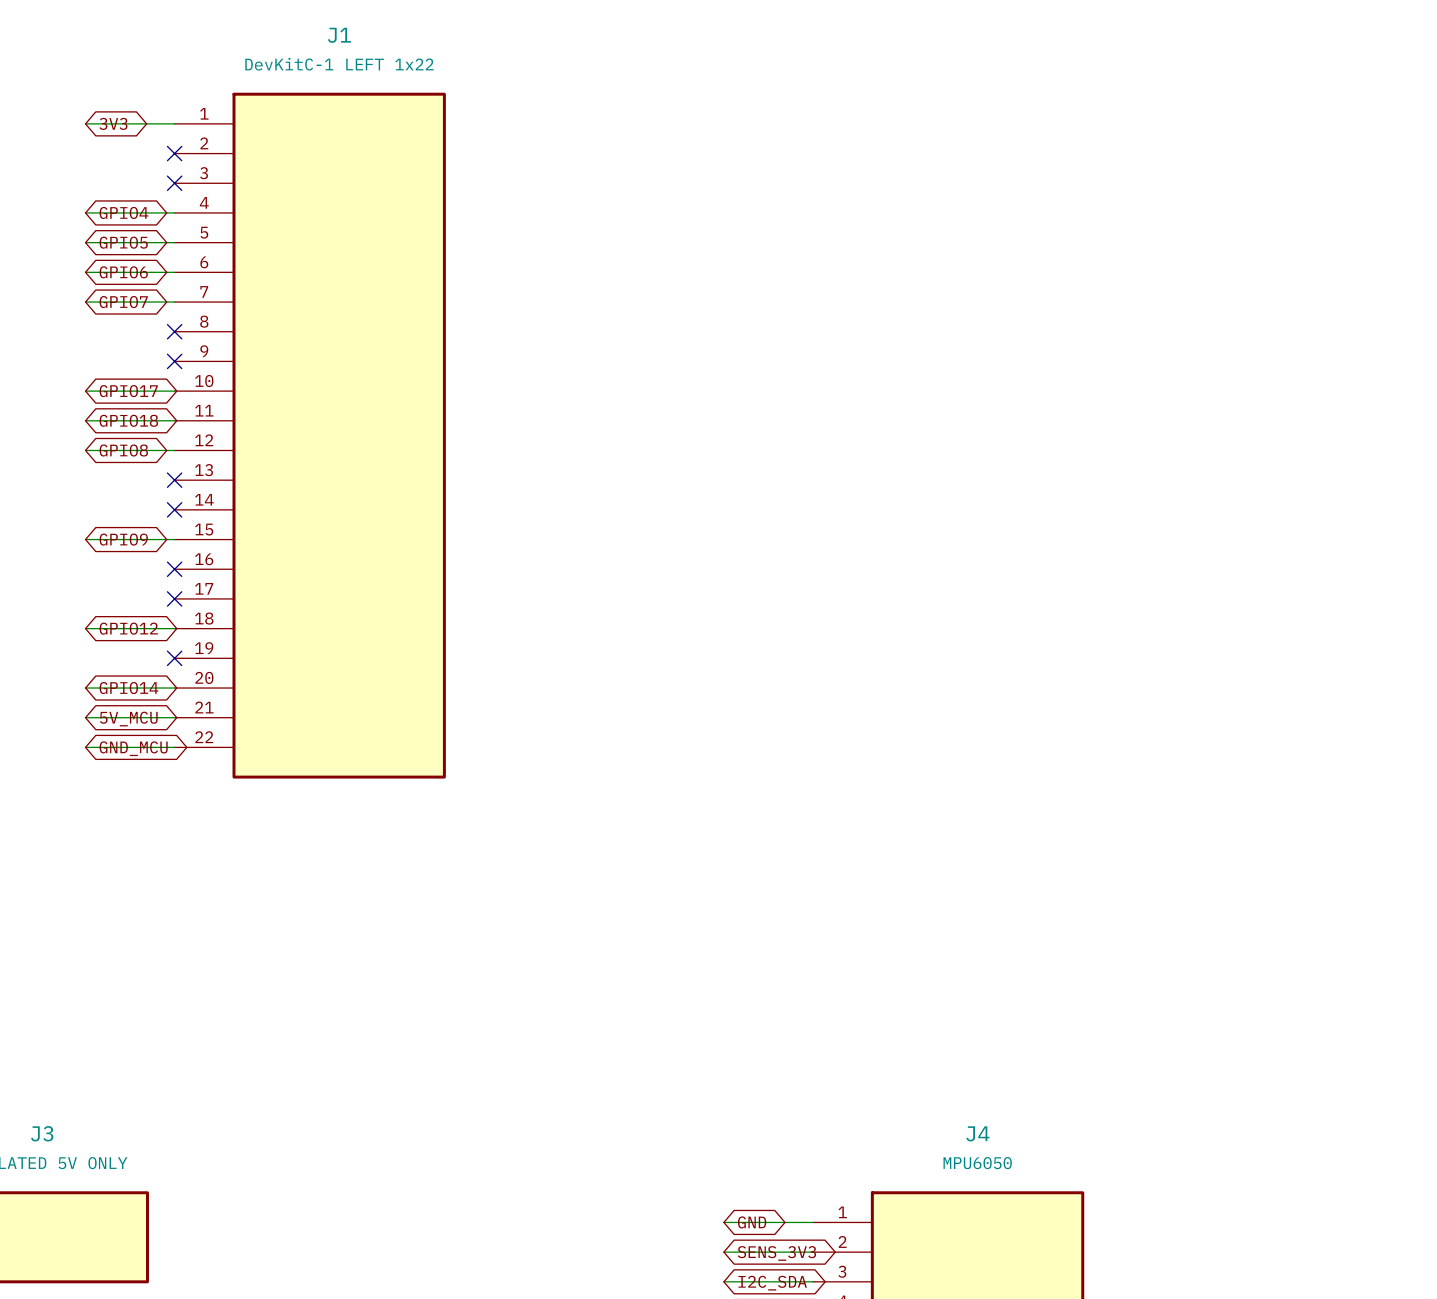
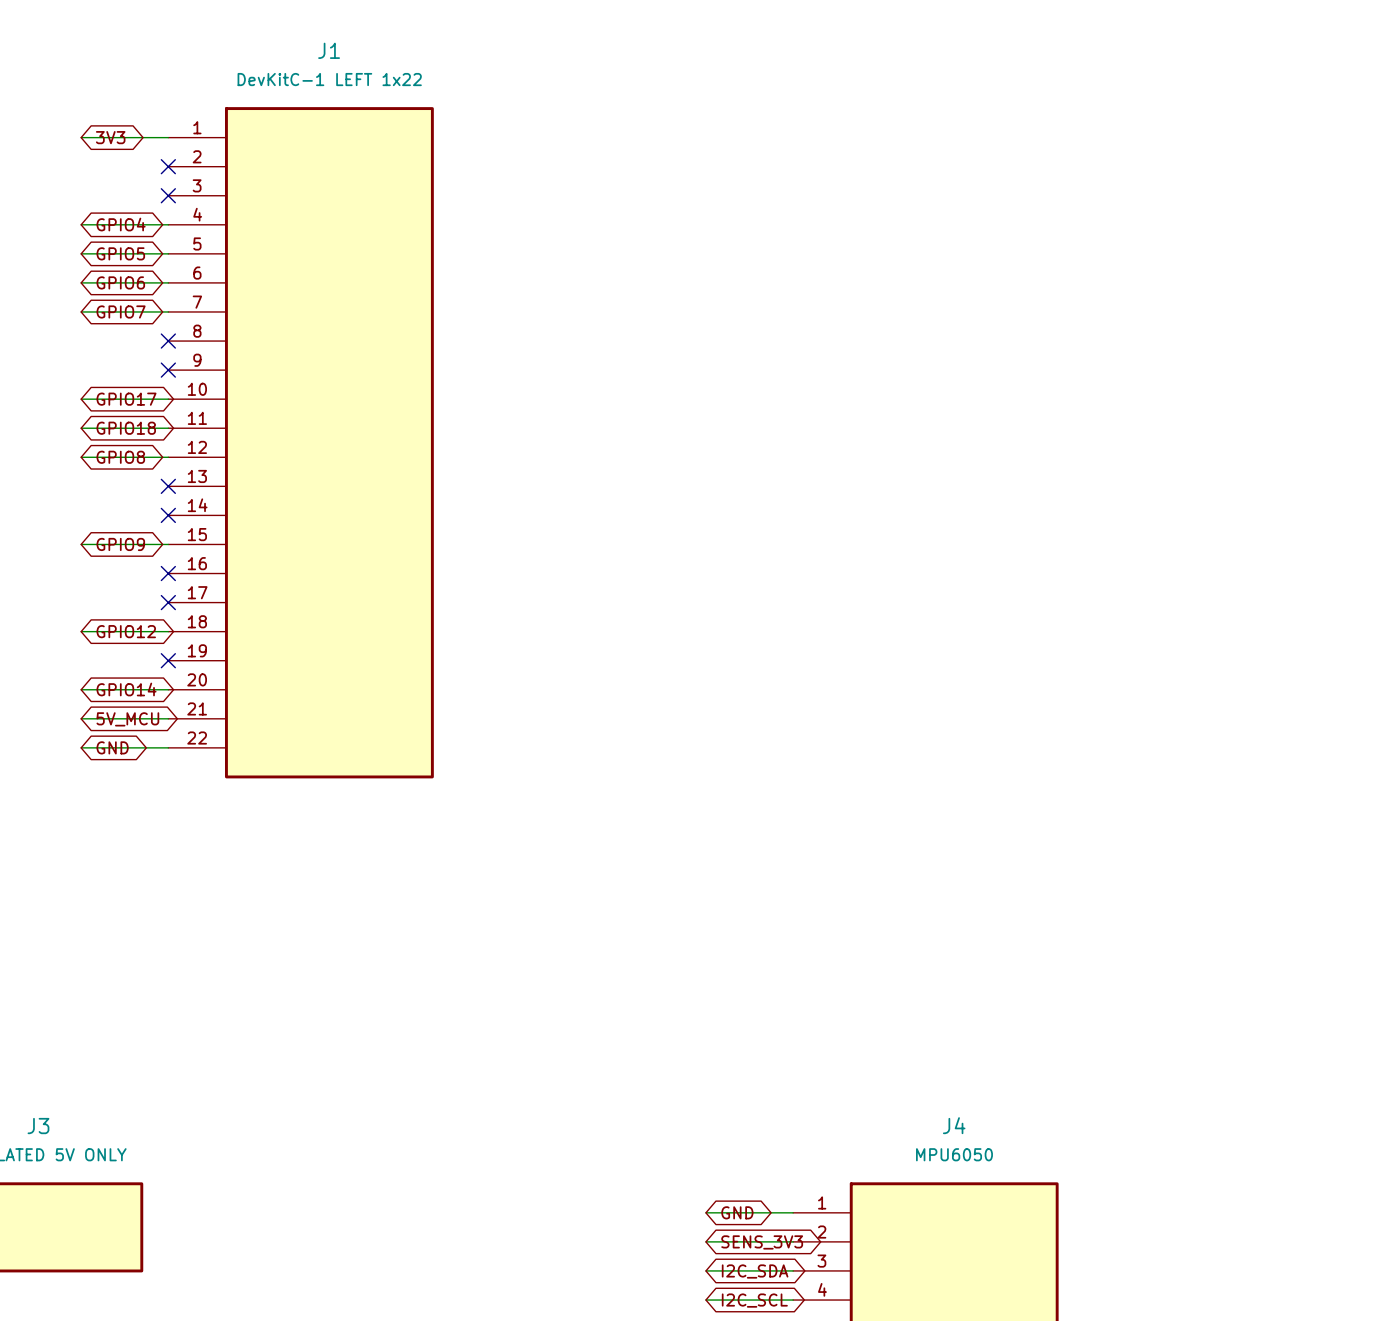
global label: GND_MCU (133, 748) -> GND (112, 747)

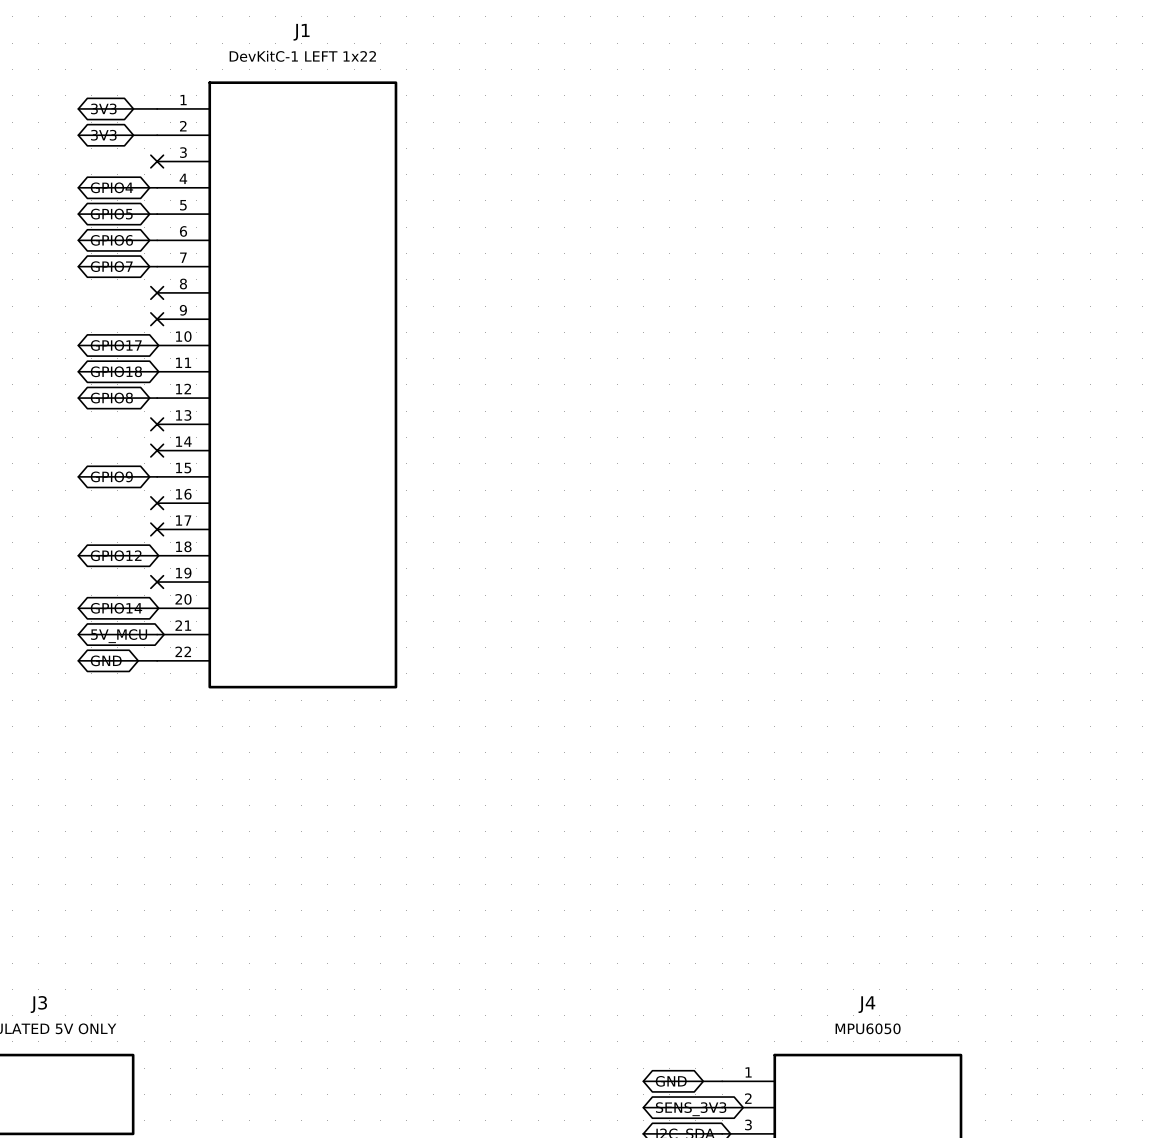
wire: none -> (78, 135) (157, 135)
global label: none -> 3V3 (103, 135)
no-connect mark: (168, 166) -> none

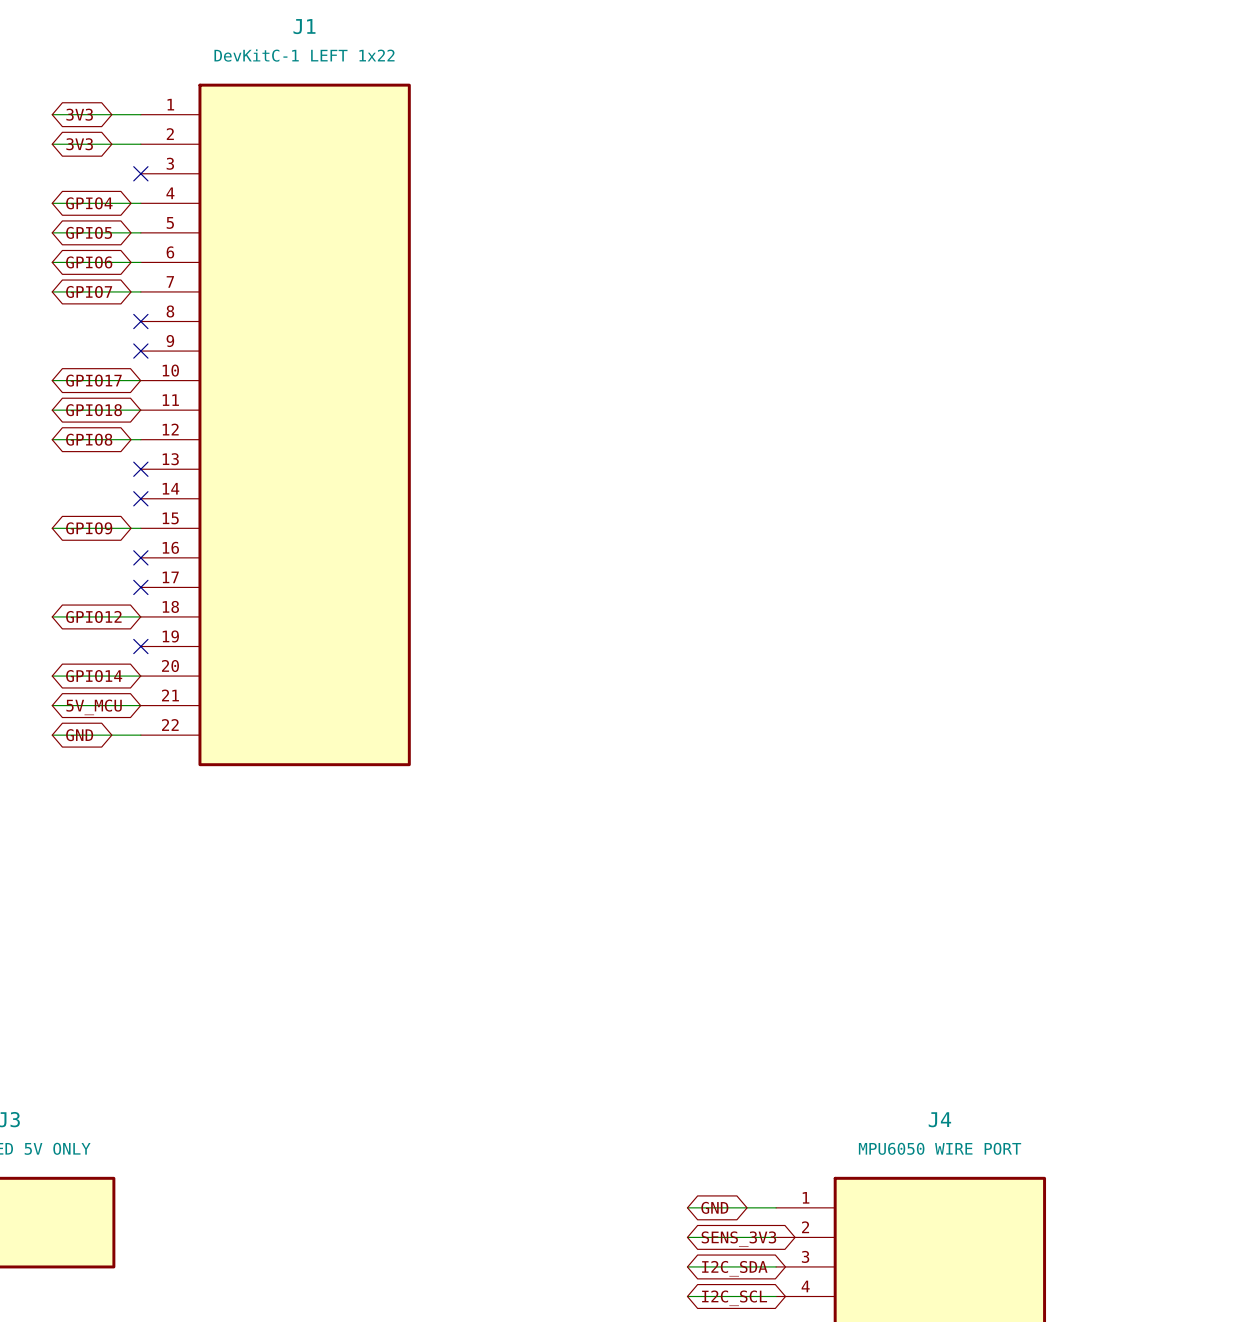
J4 value: MPU6050 (868, 1028) -> MPU6050 WIRE PORT (940, 1148)

